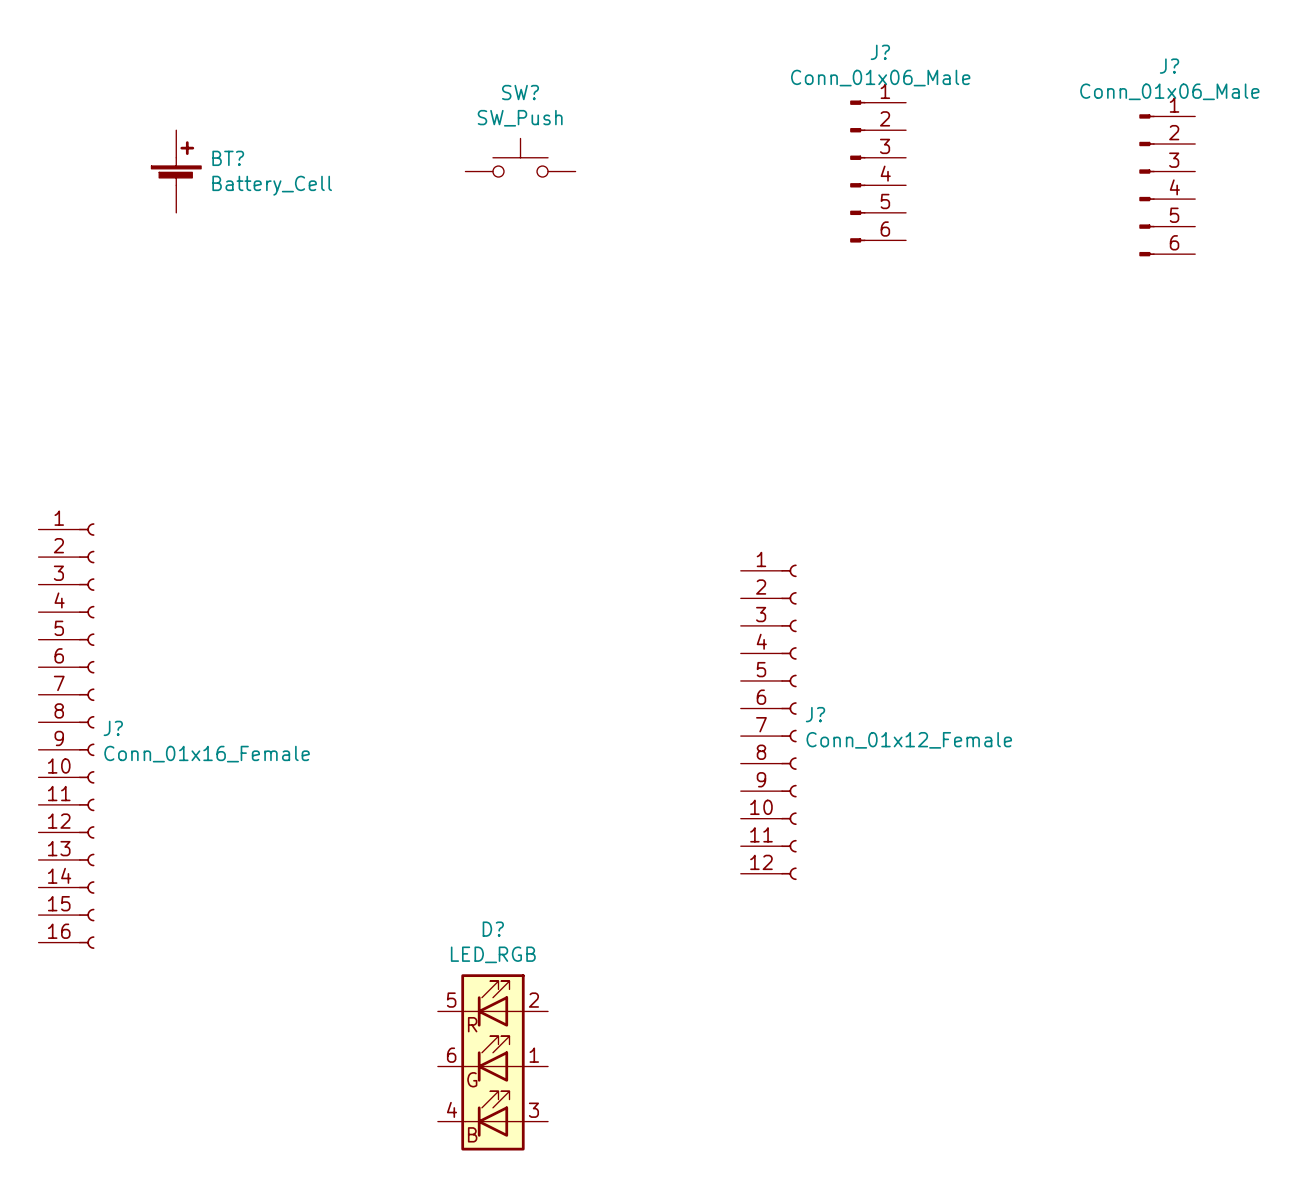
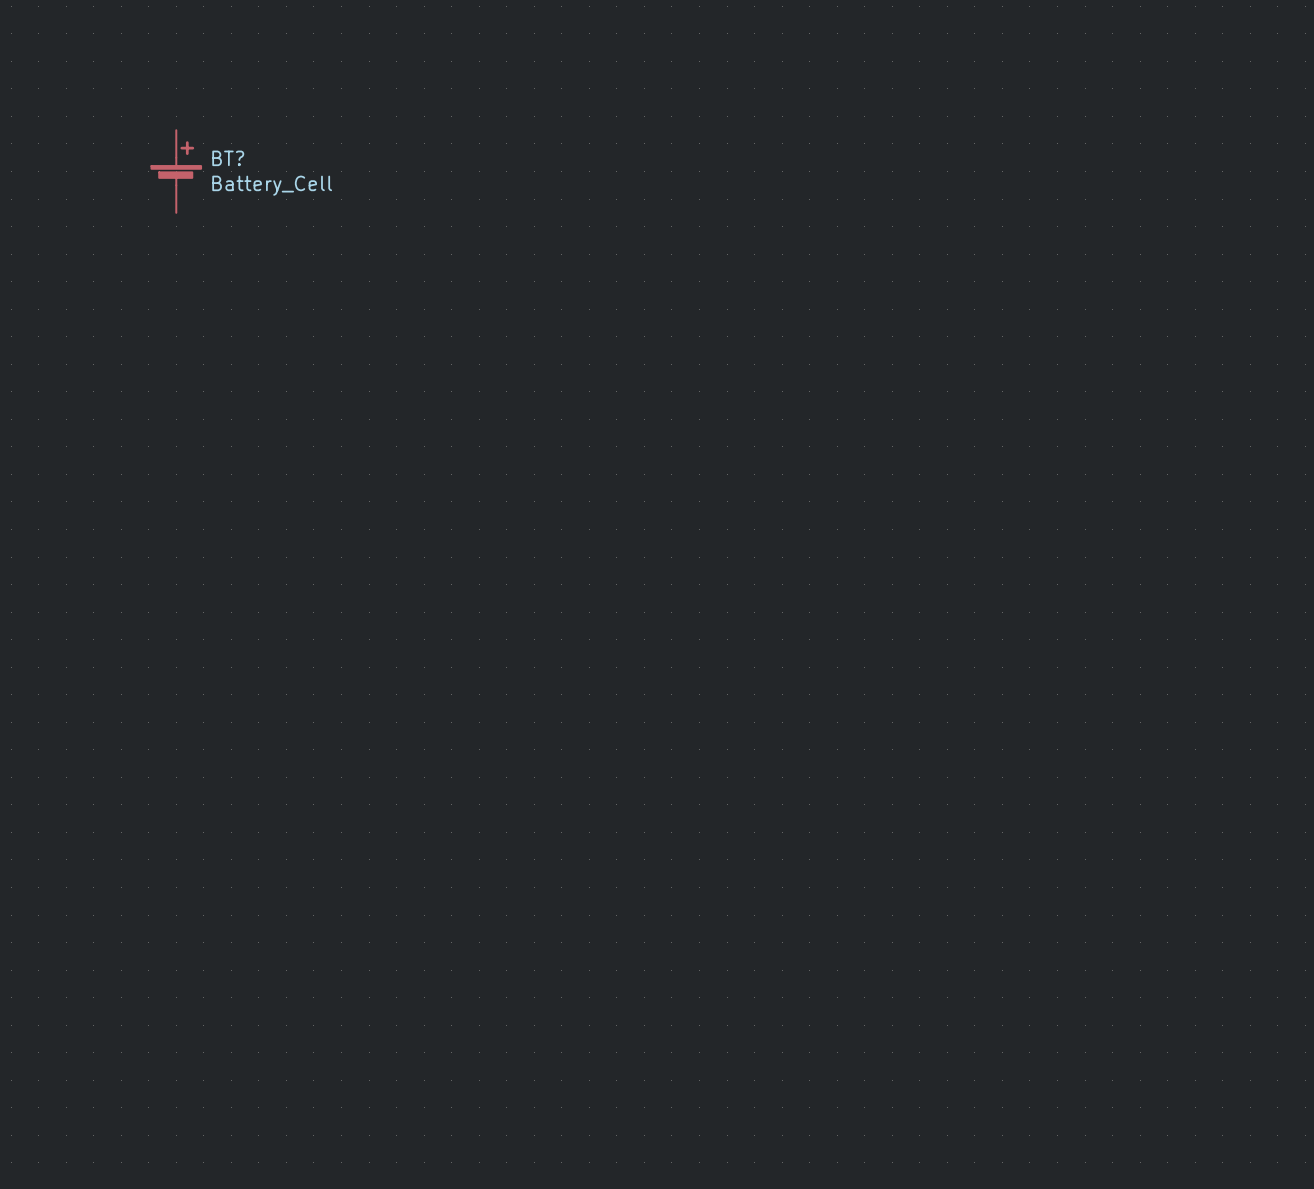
SW?: SW_Push (520, 157) -> none
J?: Conn_01x06_Male (878, 171) -> none
J?: Conn_01x06_Male (1167, 185) -> none
J?: Conn_01x12_Female (768, 722) -> none
J?: Conn_01x16_Female (66, 736) -> none
D?: LED_RGB (492, 1062) -> none

